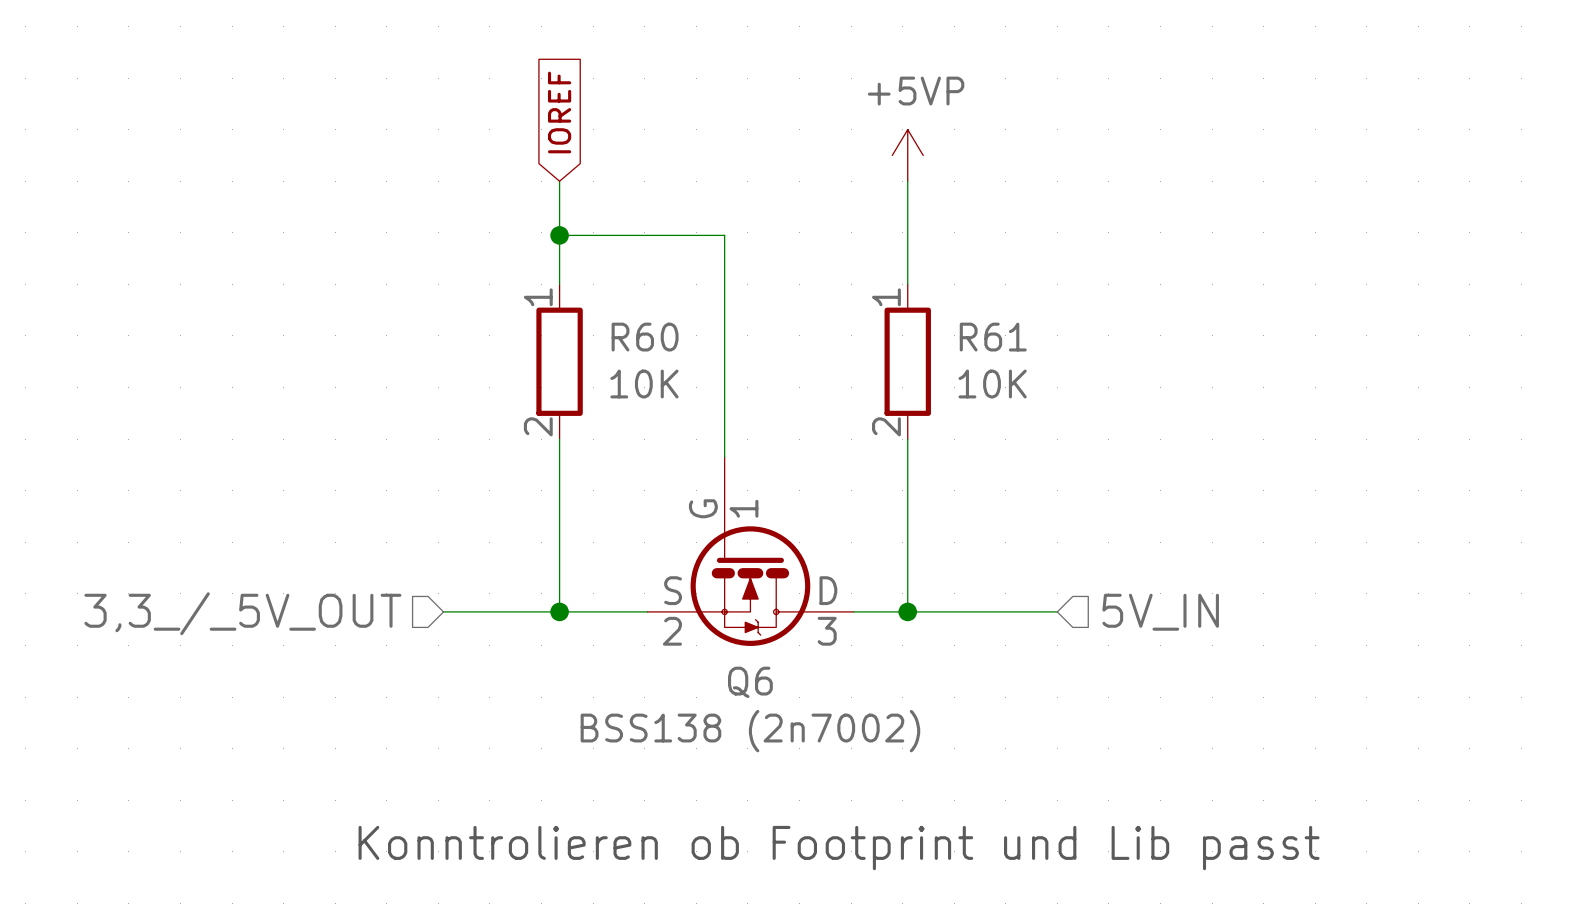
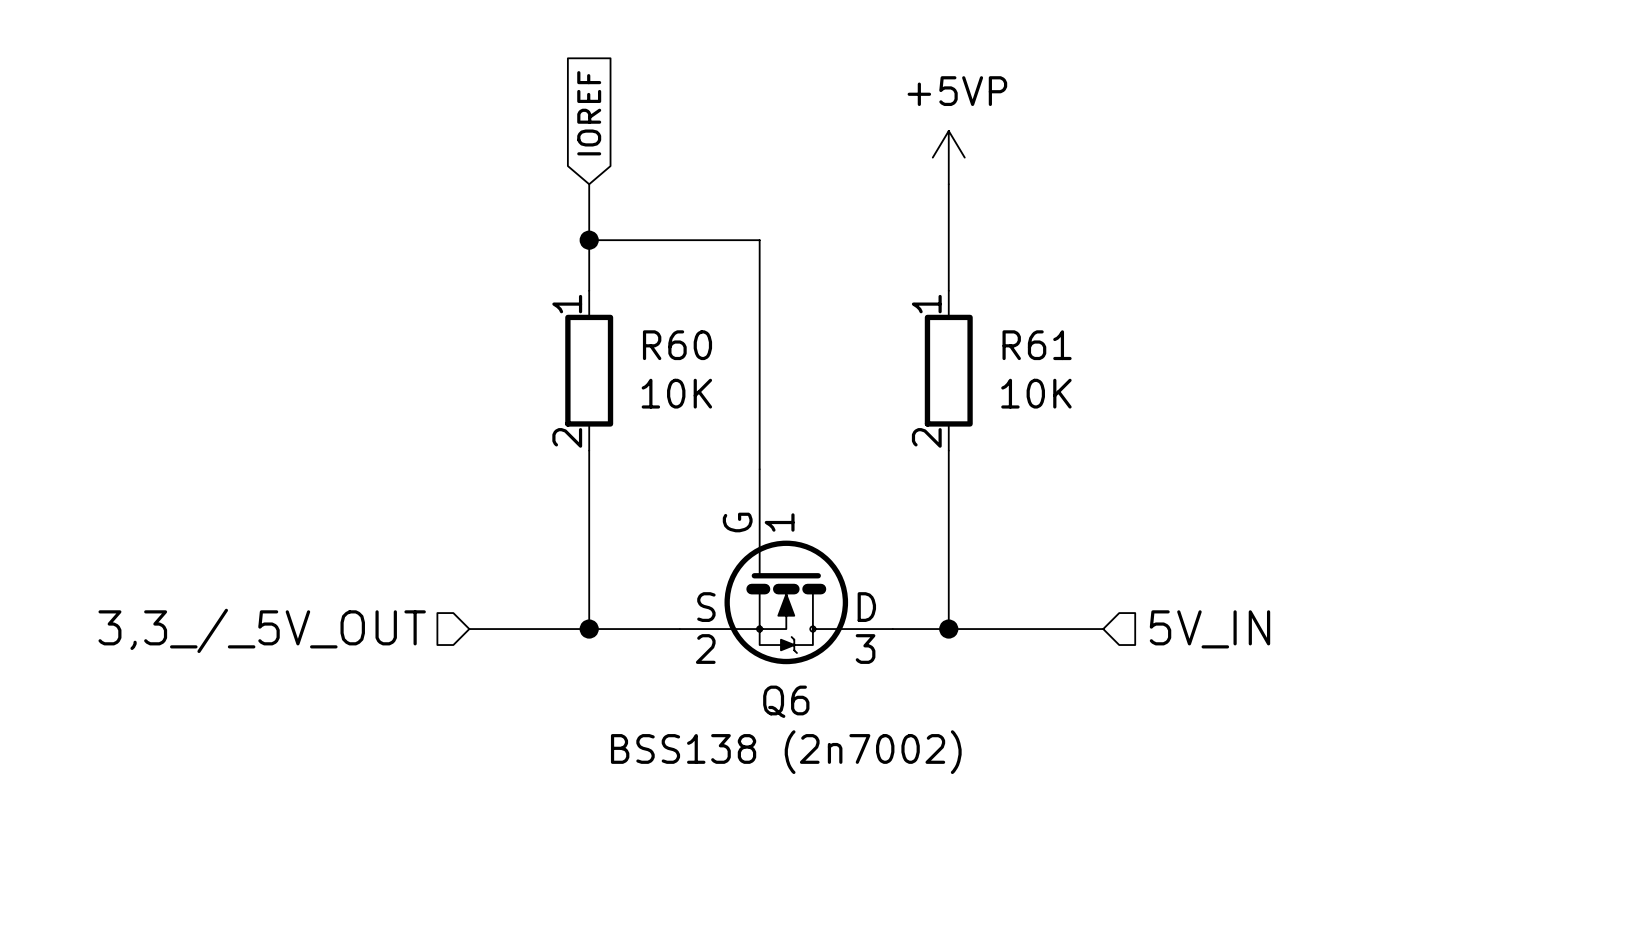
text: Konntrolieren ob Footprint und Lib passt (839, 848) -> none

